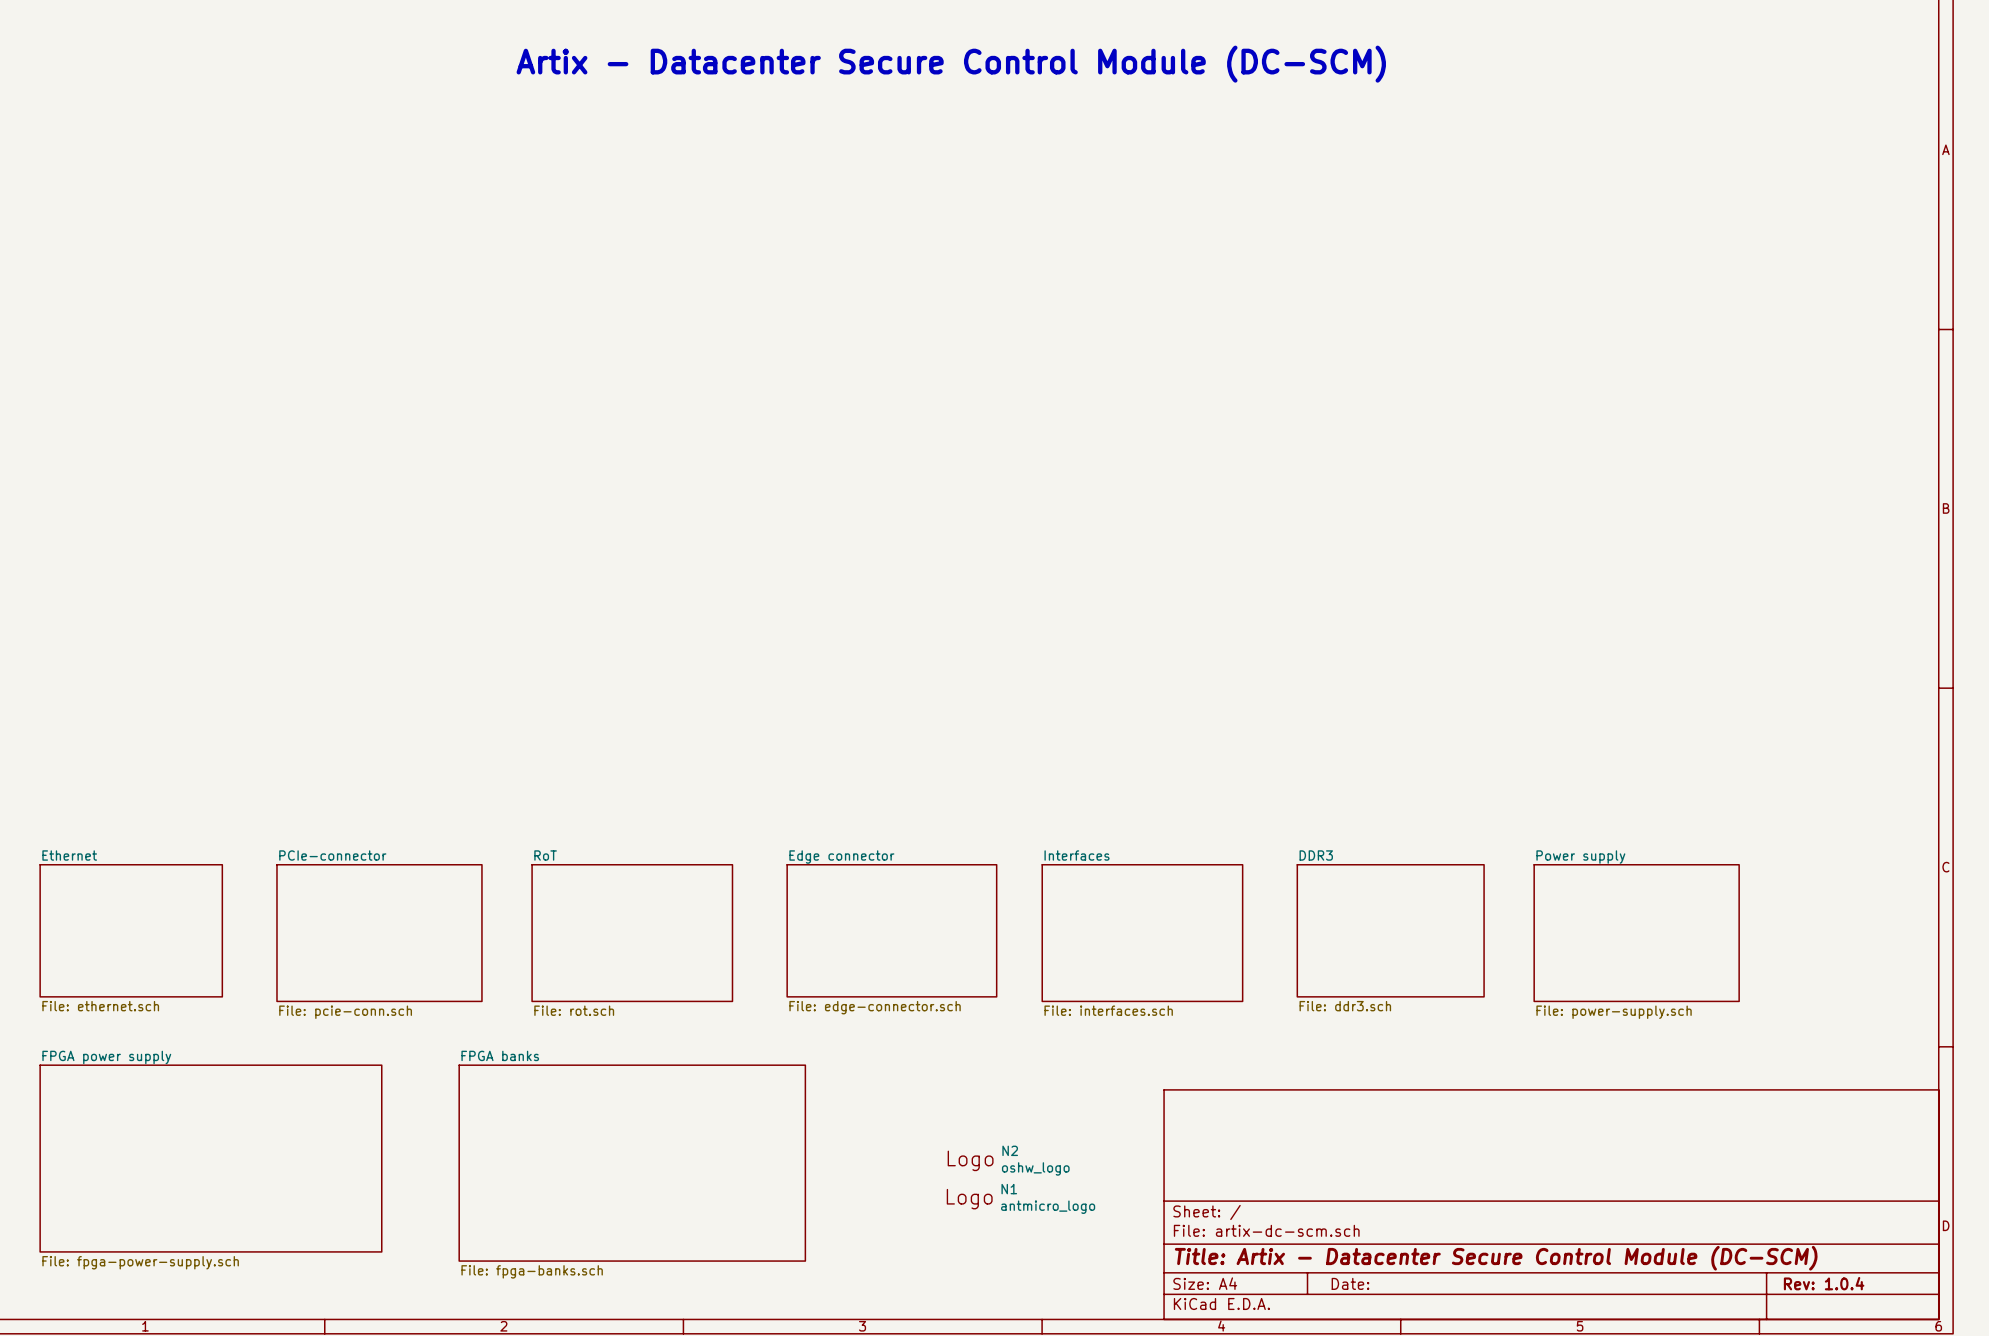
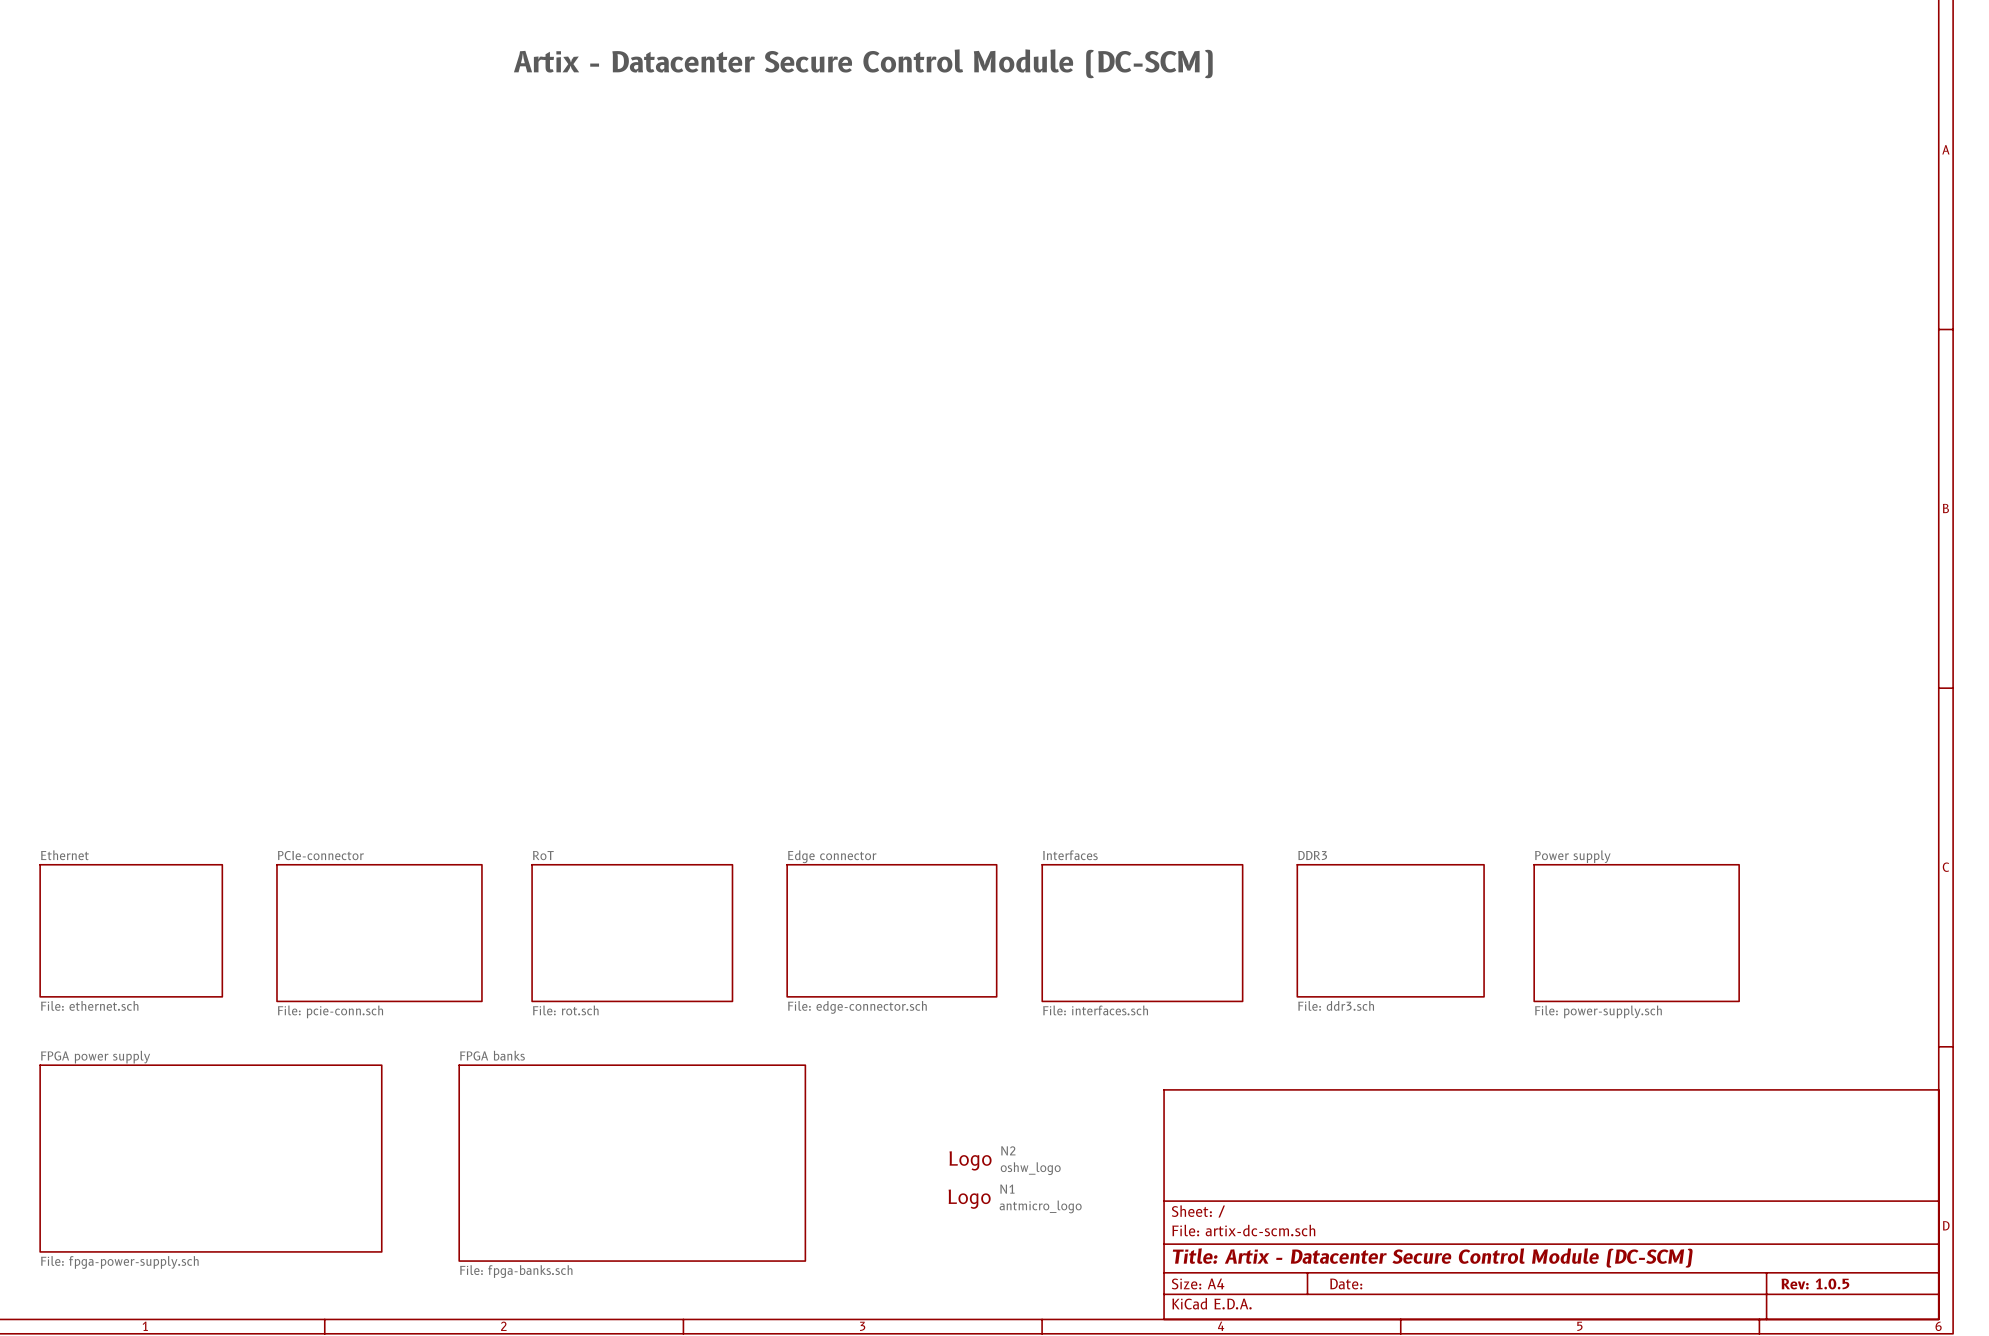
title block: Rev: 1.0.4 (1824, 1283) -> Rev: 1.0.5 (1815, 1283)

